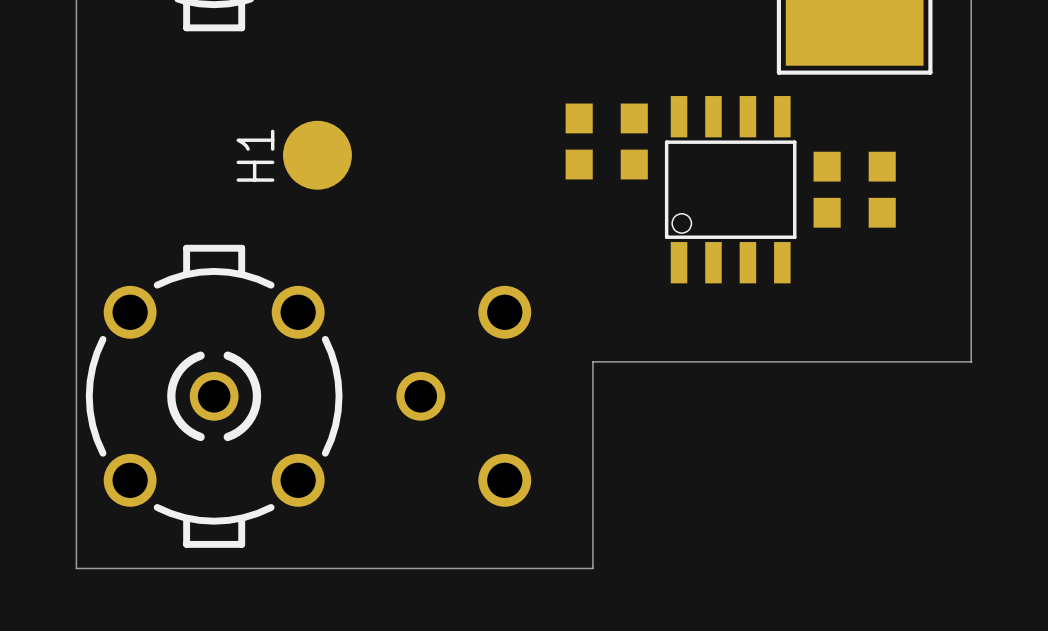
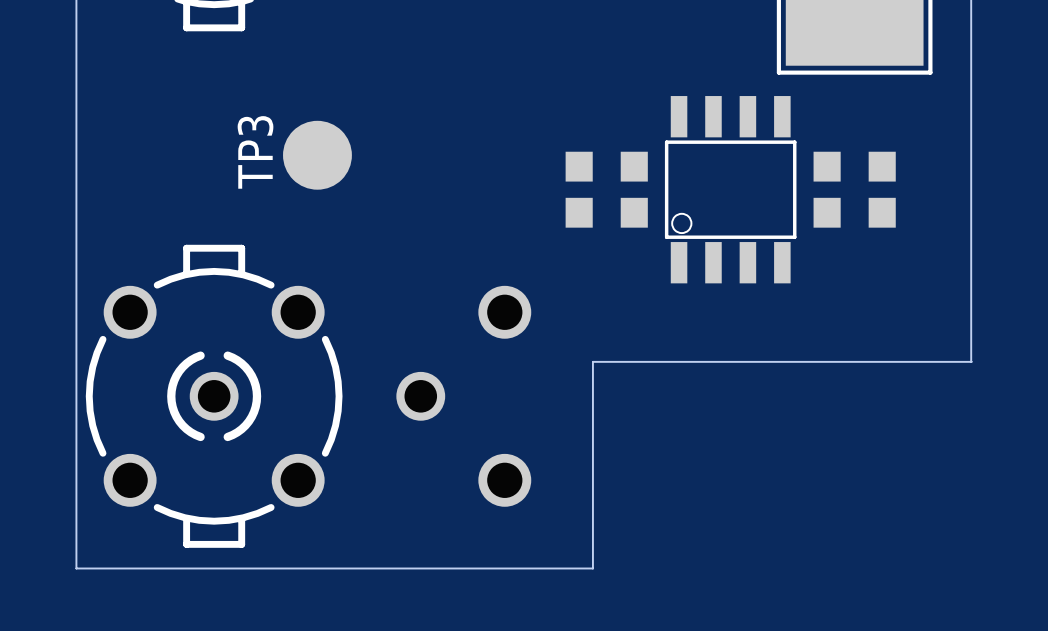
part: (579, 141) -> none
part: (634, 141) -> none
H1 name: H1 (255, 155) -> TP3 (255, 152)
part: none -> (579, 189)
part: none -> (634, 189)

